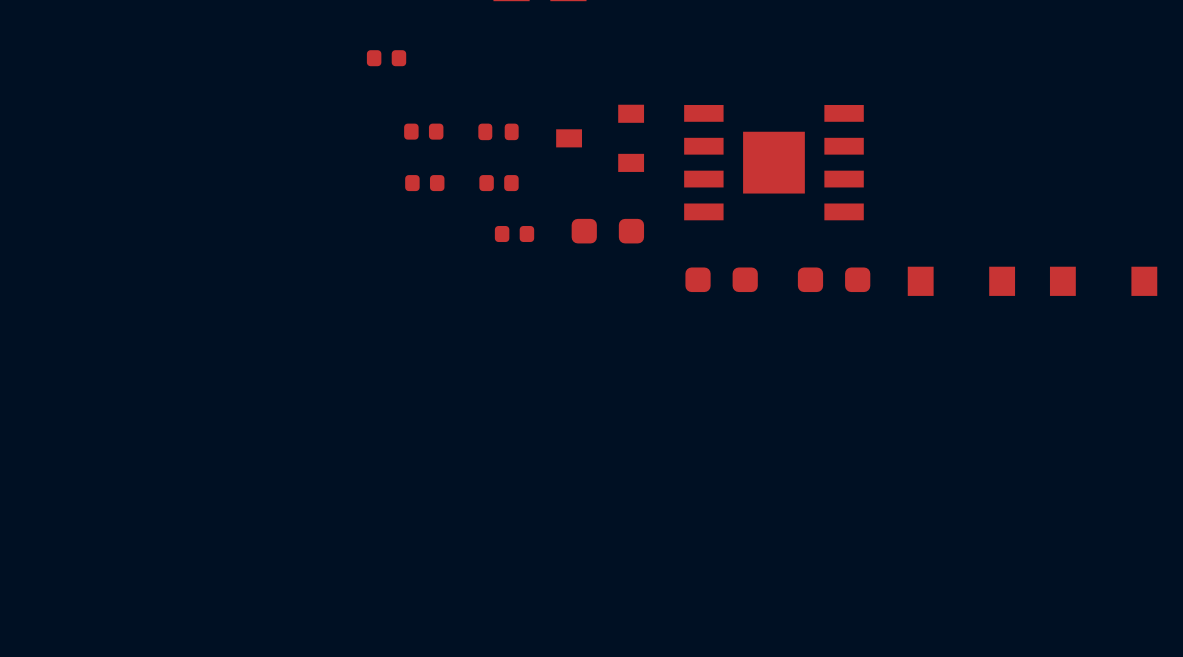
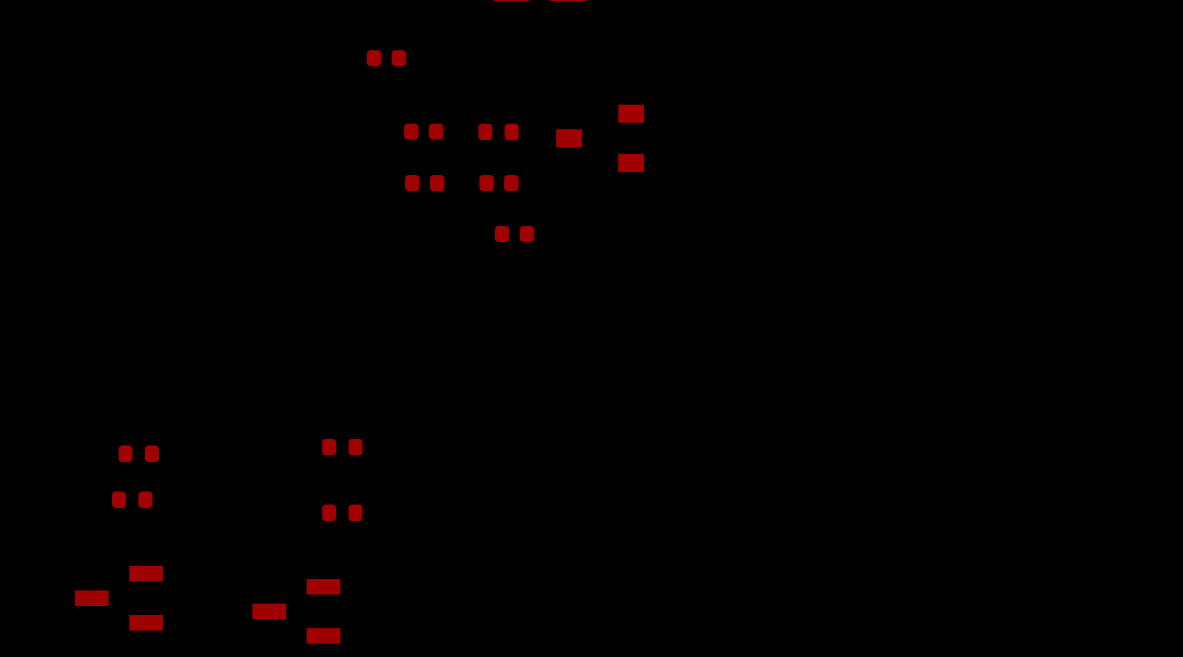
part: (773, 162) -> none
part: (607, 231) -> none
part: (721, 279) -> none
part: (834, 279) -> none
part: (961, 281) -> none
part: (1103, 281) -> none
part: none -> (342, 447)
part: none -> (138, 453)
part: none -> (132, 499)
part: none -> (342, 512)
part: none -> (119, 598)
part: none -> (296, 611)

